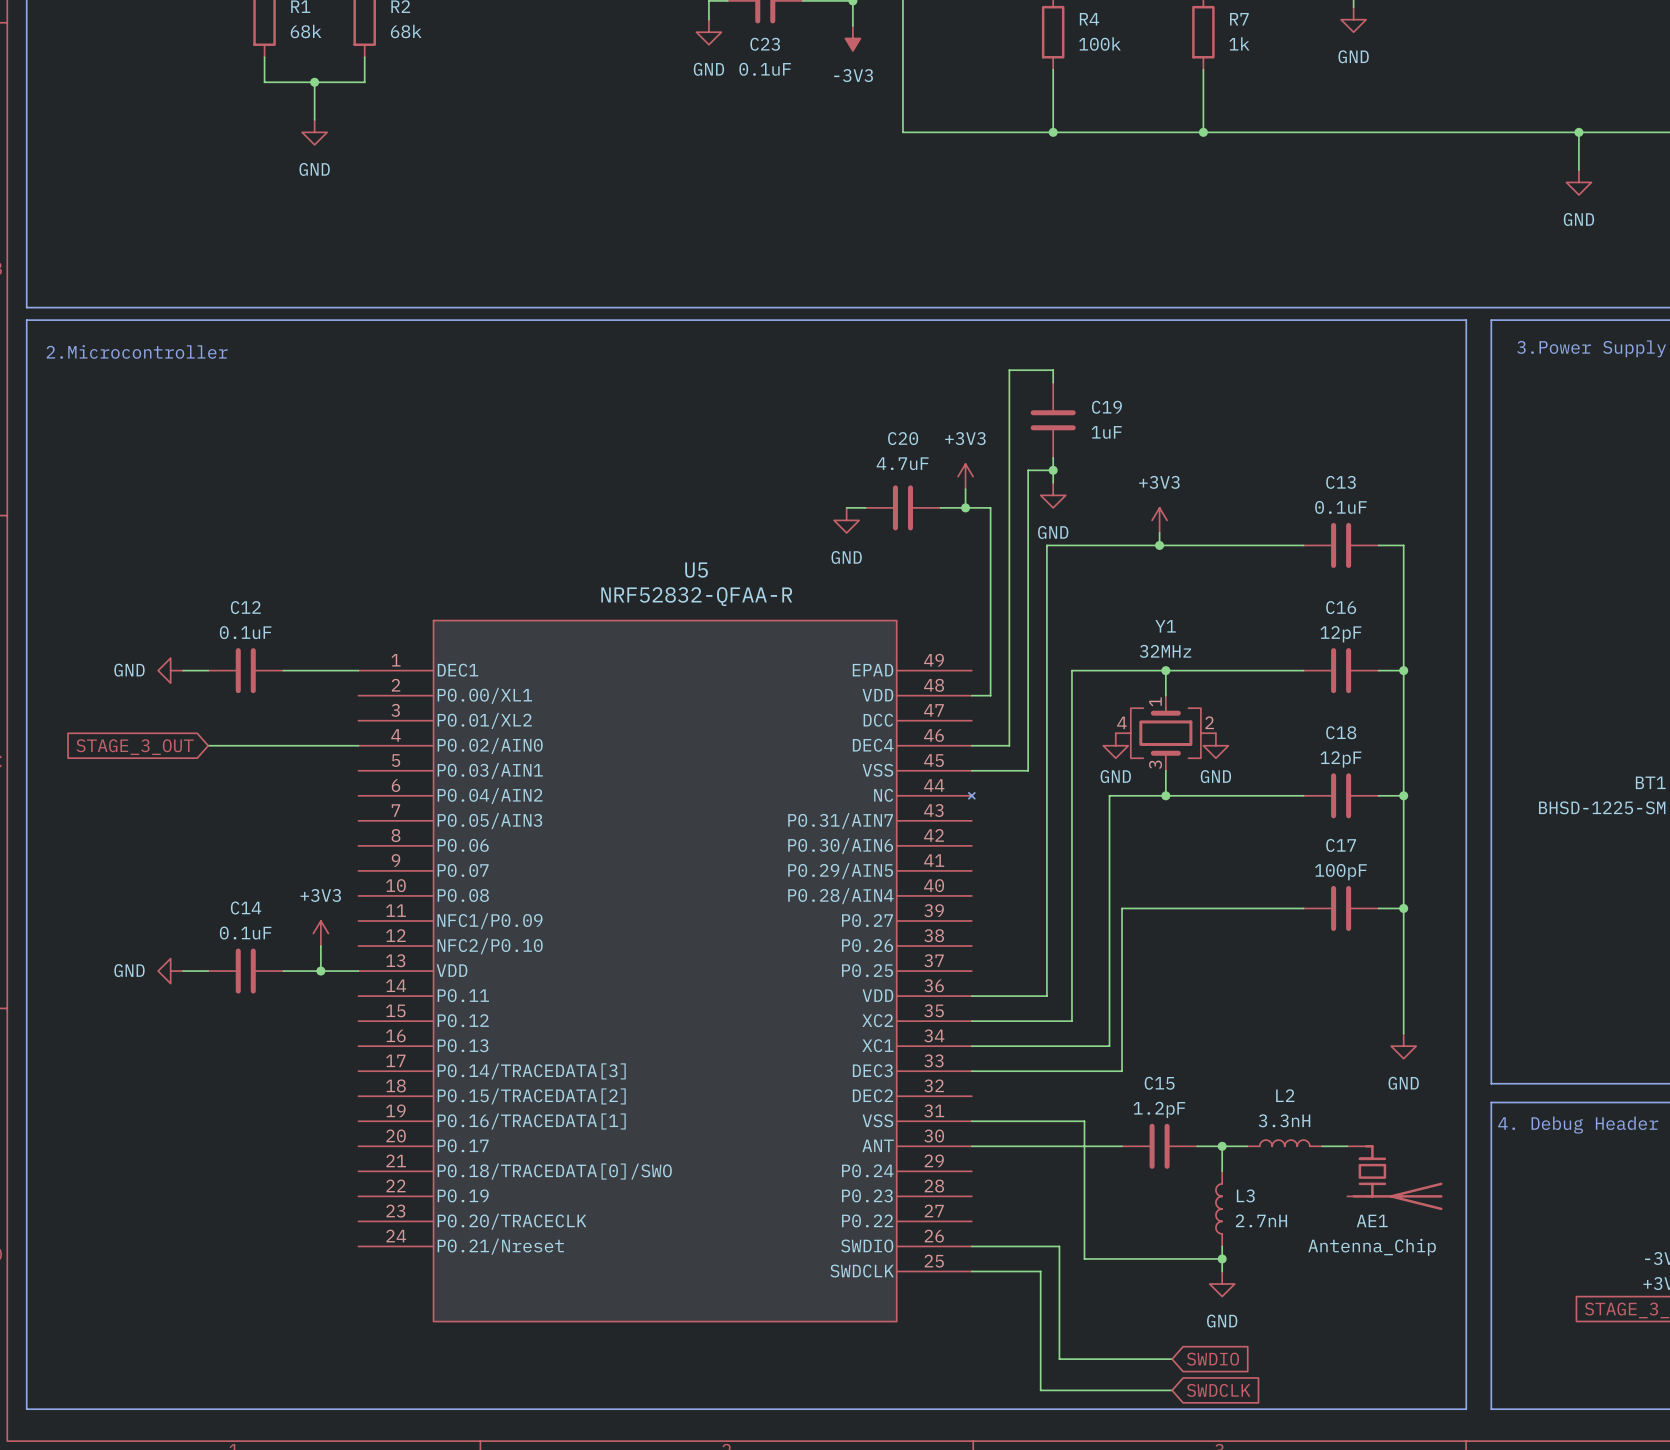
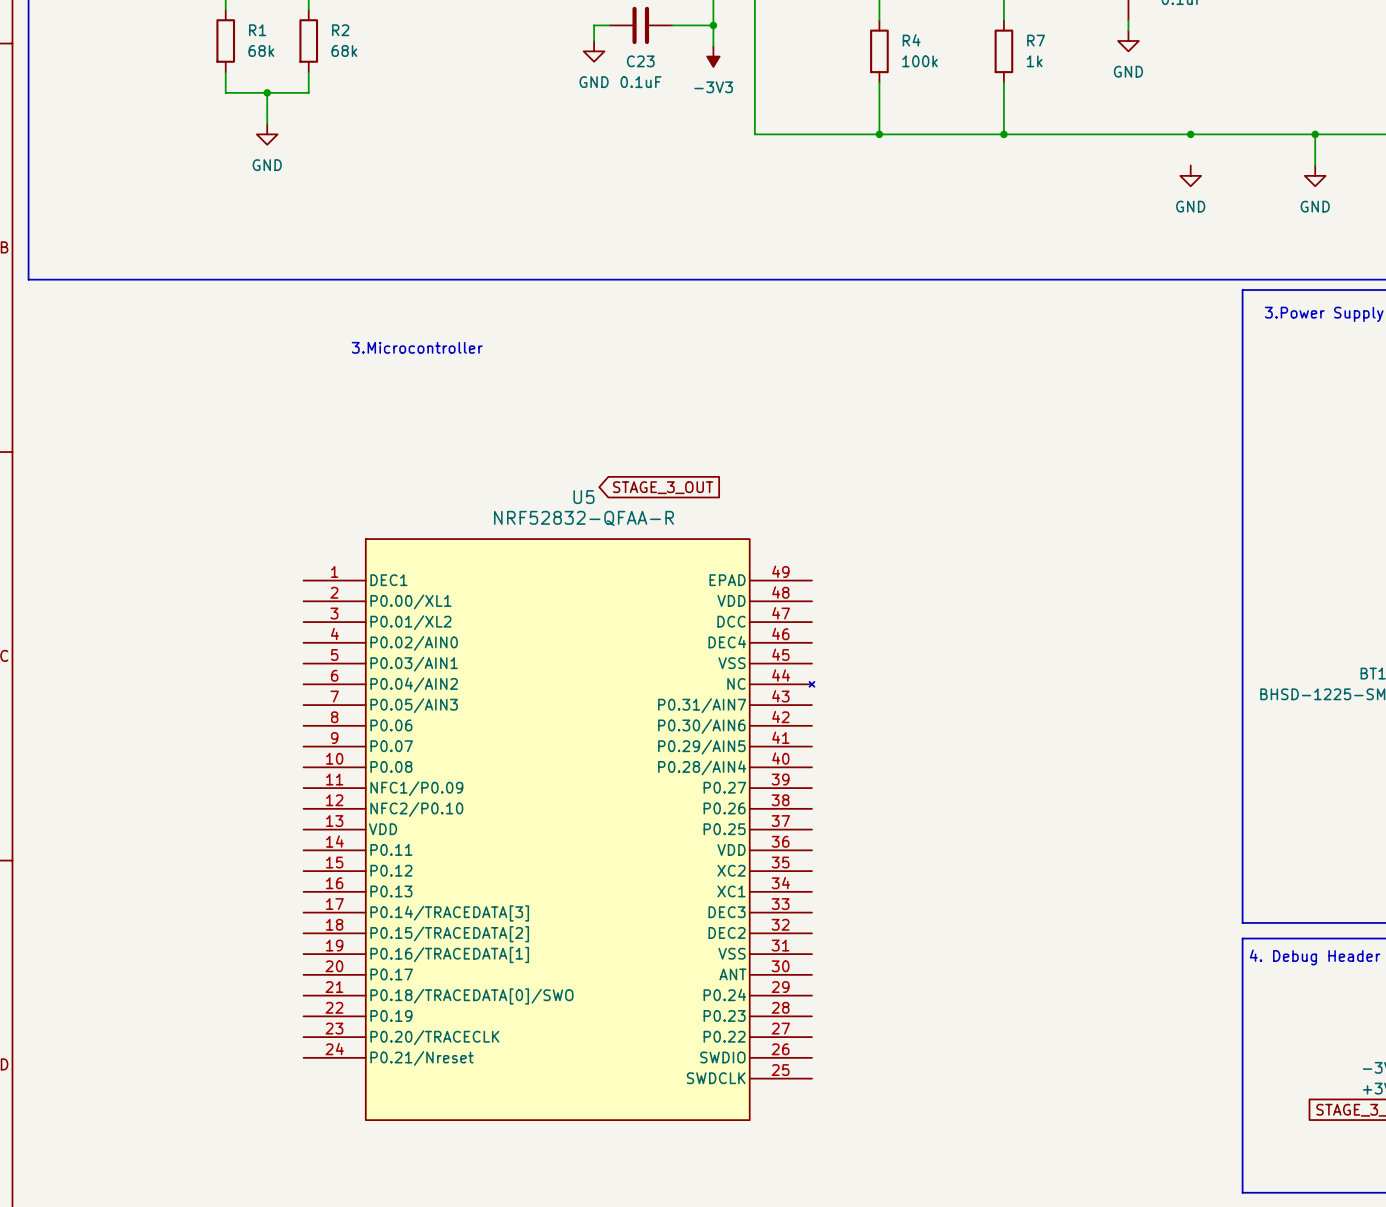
junction: none -> (1190, 134)
power symbol: none -> GND (1190, 175)
line: (26, 320) (1466, 320) (1466, 1409) (26, 1409) (26, 320) -> none
text: 2.Microcontroller (137, 351) -> none
wire: (1053, 382) (1053, 370) (1009, 370) (1009, 745) (971, 745) -> none
text: none -> 3.Microcontroller (417, 347)
C19: 1uF (1053, 420) -> none
wire: (1053, 457) (1053, 482) -> none
wire: (1053, 470) (1028, 470) (1028, 770) (971, 770) -> none
junction: (1053, 470) -> none
power symbol: +3V3 (965, 476) -> none
wire: (965, 489) (965, 507) -> none
power symbol: GND (1053, 495) -> none
wire: (846, 507) (865, 507) -> none
C20: 4.7uF (902, 507) -> none
wire: (940, 507) (990, 507) (990, 695) (971, 695) -> none
junction: (965, 507) -> none
power symbol: GND (846, 520) -> none
power symbol: +3V3 (1159, 520) -> none
wire: (1159, 532) (1159, 545) -> none
junction: (1159, 545) -> none
wire: (1303, 545) (1046, 545) (1046, 996) (971, 996) -> none
C13: 0.1uF (1341, 545) -> none
wire: (1378, 545) (1403, 545) (1403, 1033) -> none
global label: none -> STAGE_3_OUT (663, 487)
power symbol: GND (170, 670) -> none
wire: (183, 670) (208, 670) -> none
C12: 0.1uF (245, 670) -> none
wire: (283, 670) (358, 670) -> none
wire: (1165, 670) (1165, 695) -> none
junction: (1165, 670) -> none
wire: (1303, 670) (1071, 670) (1071, 1021) (971, 1021) -> none
C16: 12pF (1341, 670) -> none
wire: (1378, 670) (1403, 670) -> none
junction: (1403, 670) -> none
Y1: 32MHz (1165, 733) -> none
wire: (208, 745) (358, 745) -> none
power symbol: GND (1115, 745) -> none
power symbol: GND (1215, 745) -> none
global label: STAGE_3_OUT (135, 747) -> none
wire: (1165, 770) (1165, 795) -> none
junction: (1165, 795) -> none
wire: (1303, 795) (1109, 795) (1109, 1046) (971, 1046) -> none
C18: 12pF (1341, 795) -> none
wire: (1378, 795) (1403, 795) -> none
junction: (1403, 795) -> none
wire: (1303, 908) (1122, 908) (1122, 1071) (971, 1071) -> none
C17: 100pF (1341, 908) -> none
wire: (1378, 908) (1403, 908) -> none
junction: (1403, 908) -> none
power symbol: +3V3 (320, 933) -> none
wire: (320, 946) (320, 971) -> none
power symbol: GND (170, 971) -> none
wire: (183, 971) (208, 971) -> none
C14: 0.1uF (245, 971) -> none
wire: (283, 971) (358, 971) -> none
junction: (320, 971) -> none
power symbol: GND (1403, 1046) -> none
wire: (971, 1121) (1084, 1121) (1084, 1258) (1222, 1258) -> none
L2: 3.3nH (1284, 1143) -> none
wire: (971, 1146) (1122, 1146) -> none
C15: 1.2pF (1159, 1146) -> none
wire: (1197, 1146) (1247, 1146) -> none
wire: (1222, 1146) (1222, 1171) -> none
junction: (1222, 1146) -> none
wire: (1322, 1146) (1347, 1146) -> none
AE1: Antenna_Chip (1394, 1177) -> none
L3: 2.7nH (1219, 1208) -> none
wire: (971, 1246) (1059, 1246) (1059, 1359) (1172, 1359) -> none
wire: (1222, 1246) (1222, 1271) -> none
junction: (1222, 1258) -> none
wire: (971, 1271) (1040, 1271) (1040, 1390) (1172, 1390) -> none
power symbol: GND (1222, 1284) -> none
global label: SWDIO (1212, 1359) -> none
global label: SWDCLK (1218, 1390) -> none

